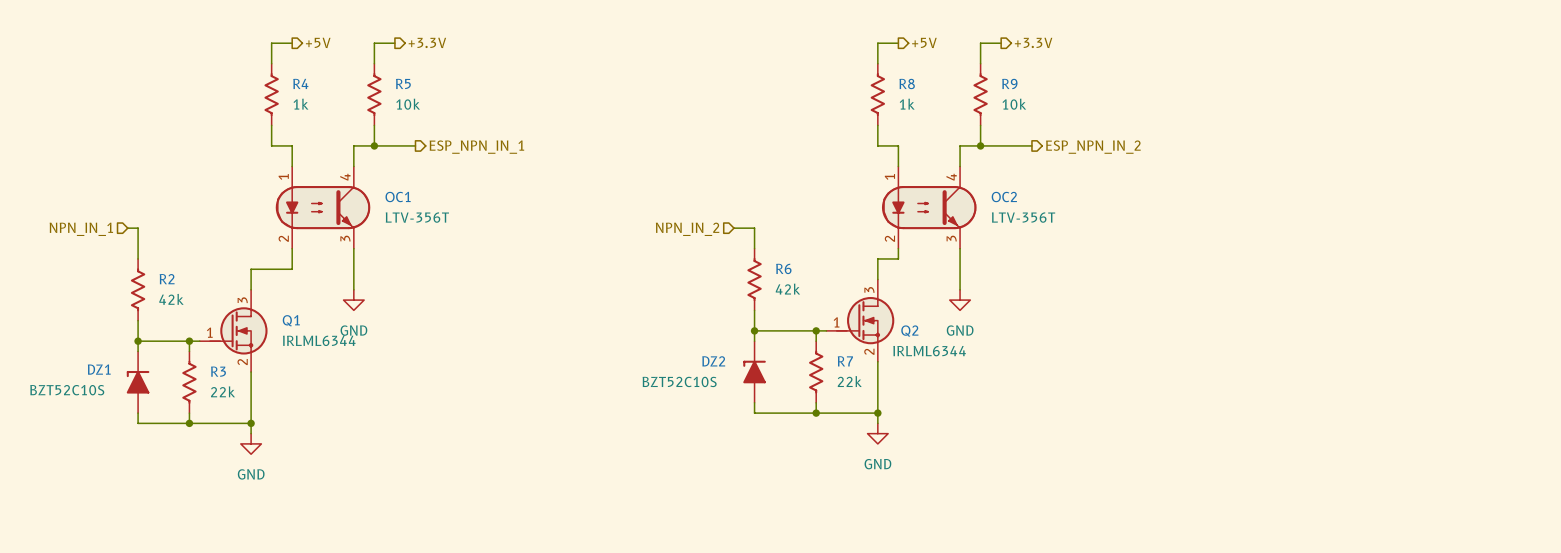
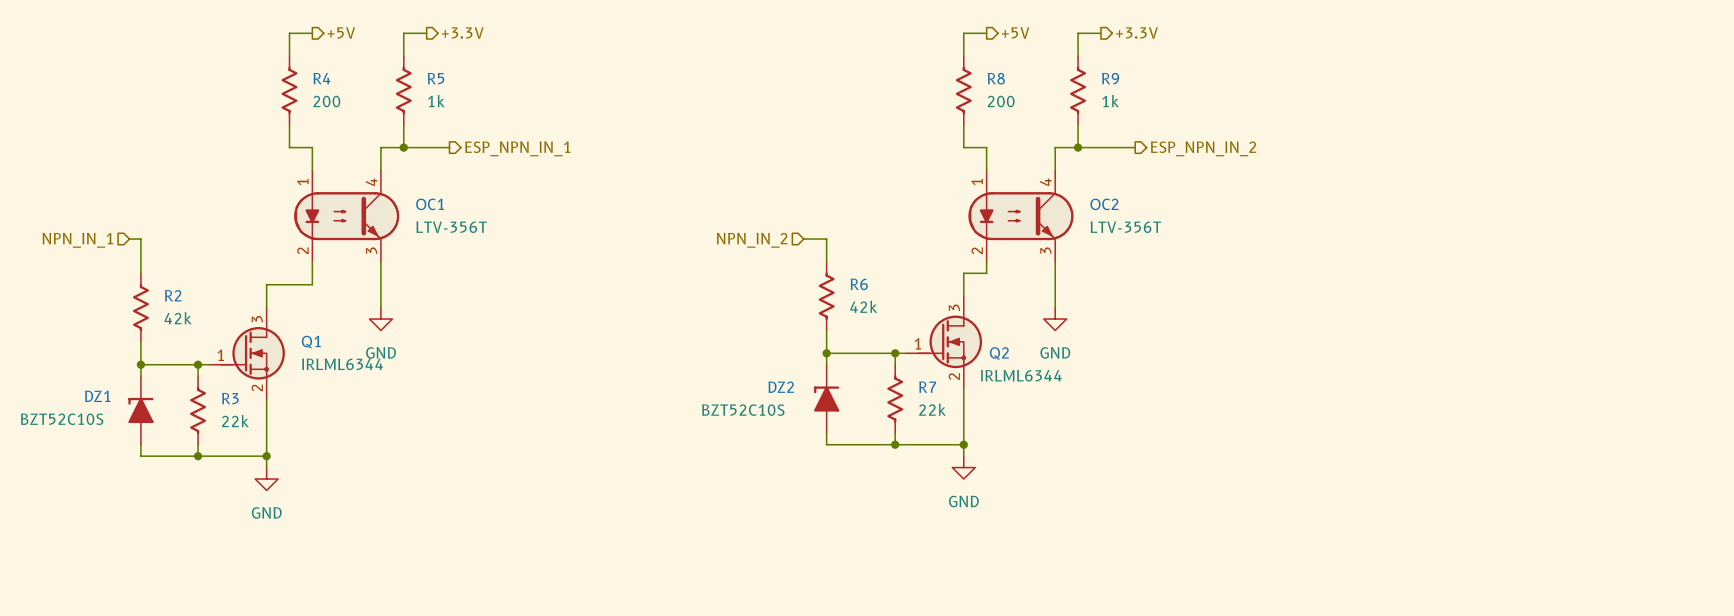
R4 value: 1k (300, 104) -> 200 (326, 101)
R5 value: 10k (408, 104) -> 1k (436, 101)
R8 value: 1k (907, 104) -> 200 (1001, 101)
R9 value: 10k (1014, 104) -> 1k (1110, 101)

